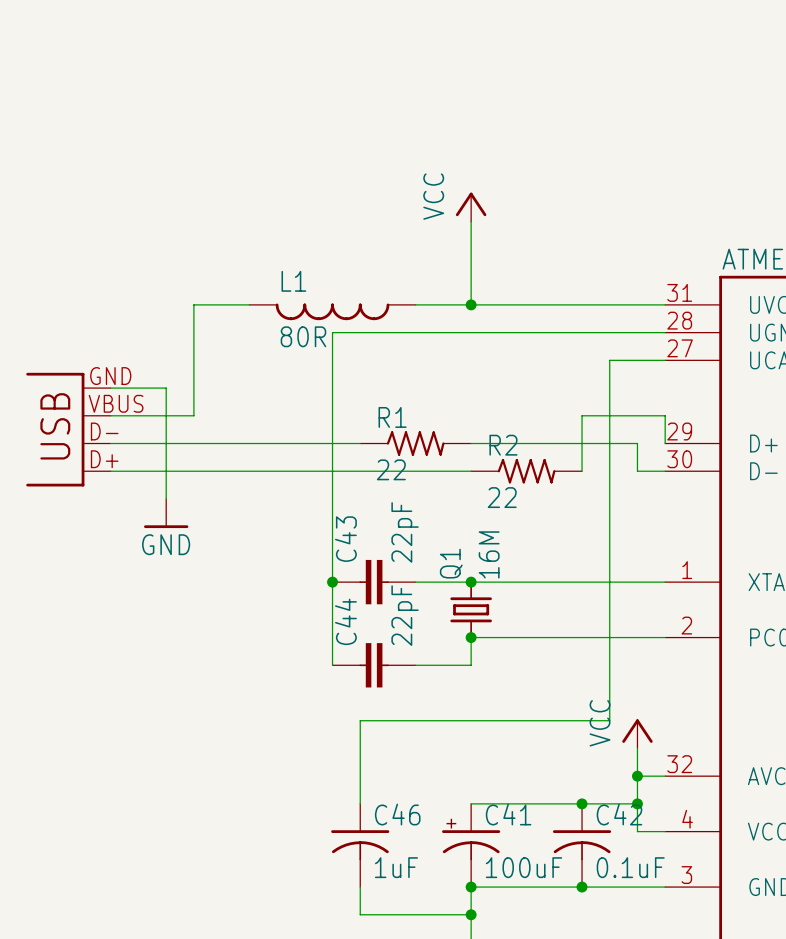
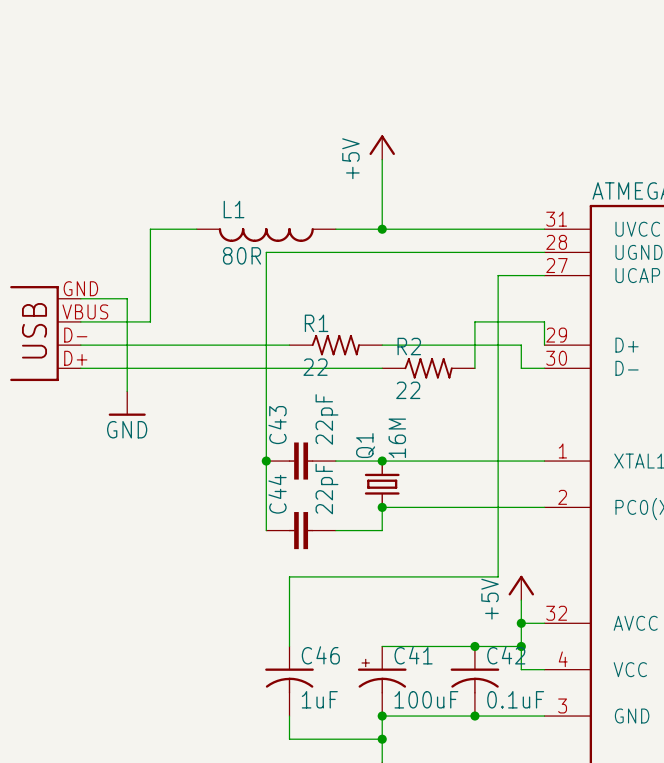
power symbol: VCC (471, 207) -> +5V (382, 147)
power symbol: VCC (637, 733) -> +5V (521, 587)

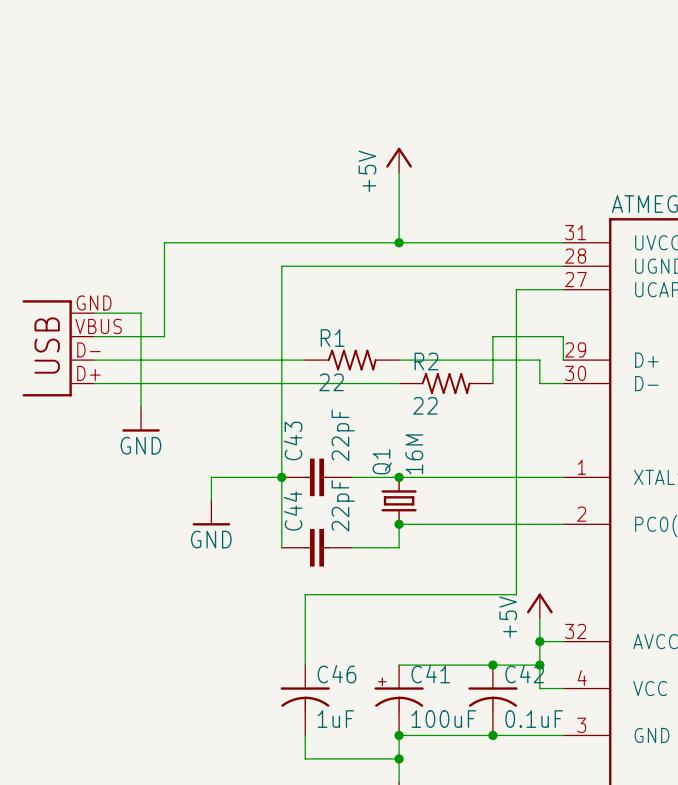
wire: none -> (211, 242) (352, 242)
L1: 80R (266, 235) -> none
wire: none -> (281, 477) (211, 477) (211, 500)
power symbol: none -> GND (211, 513)

